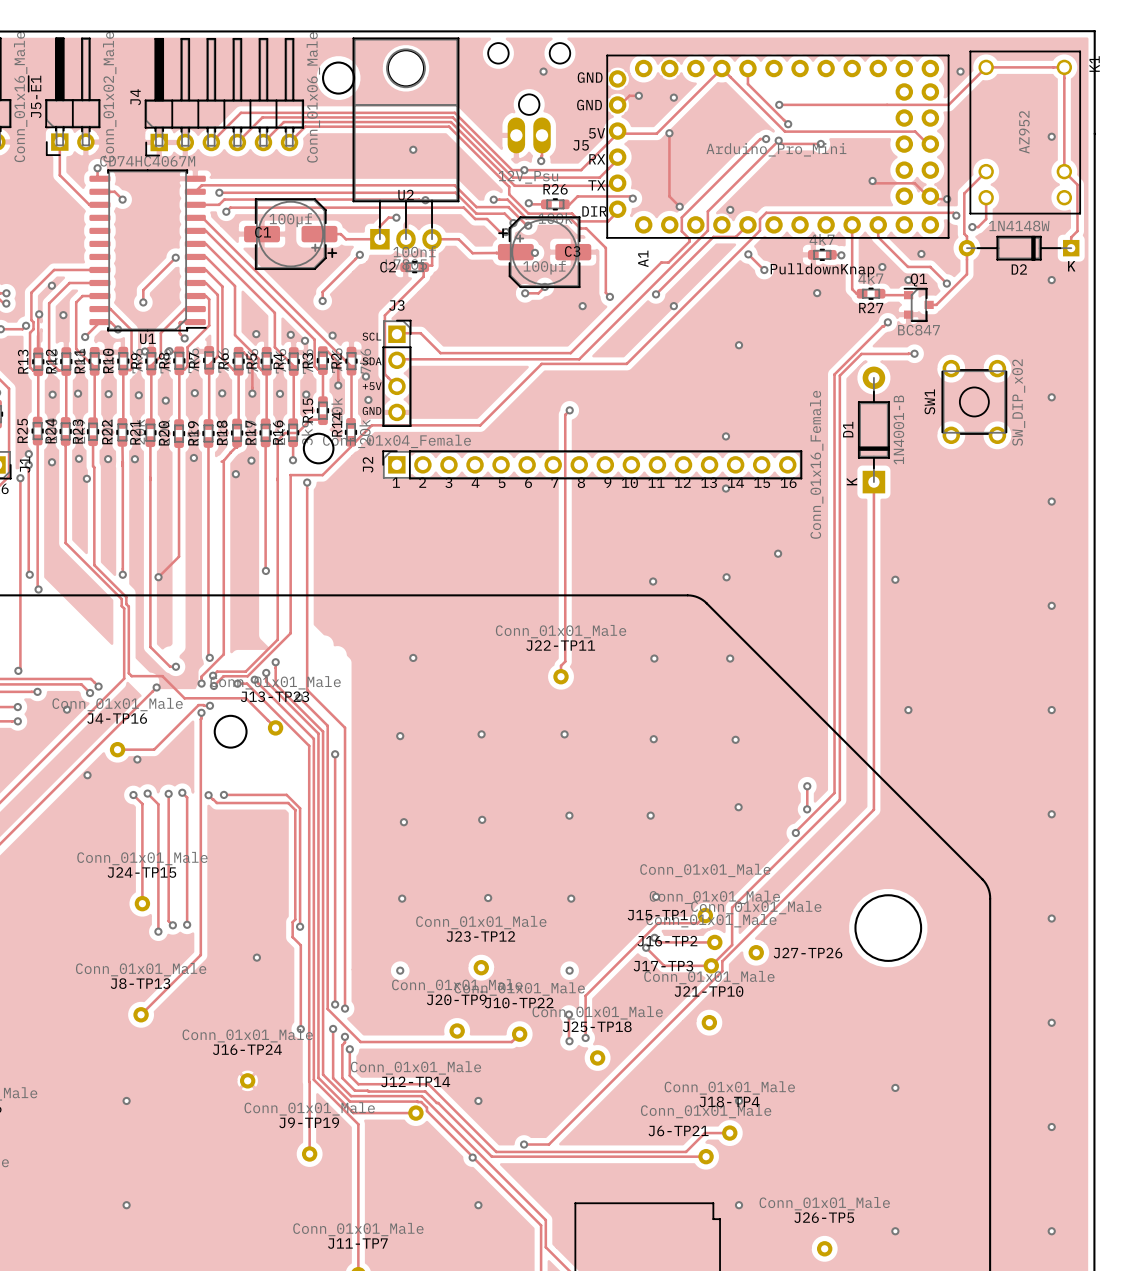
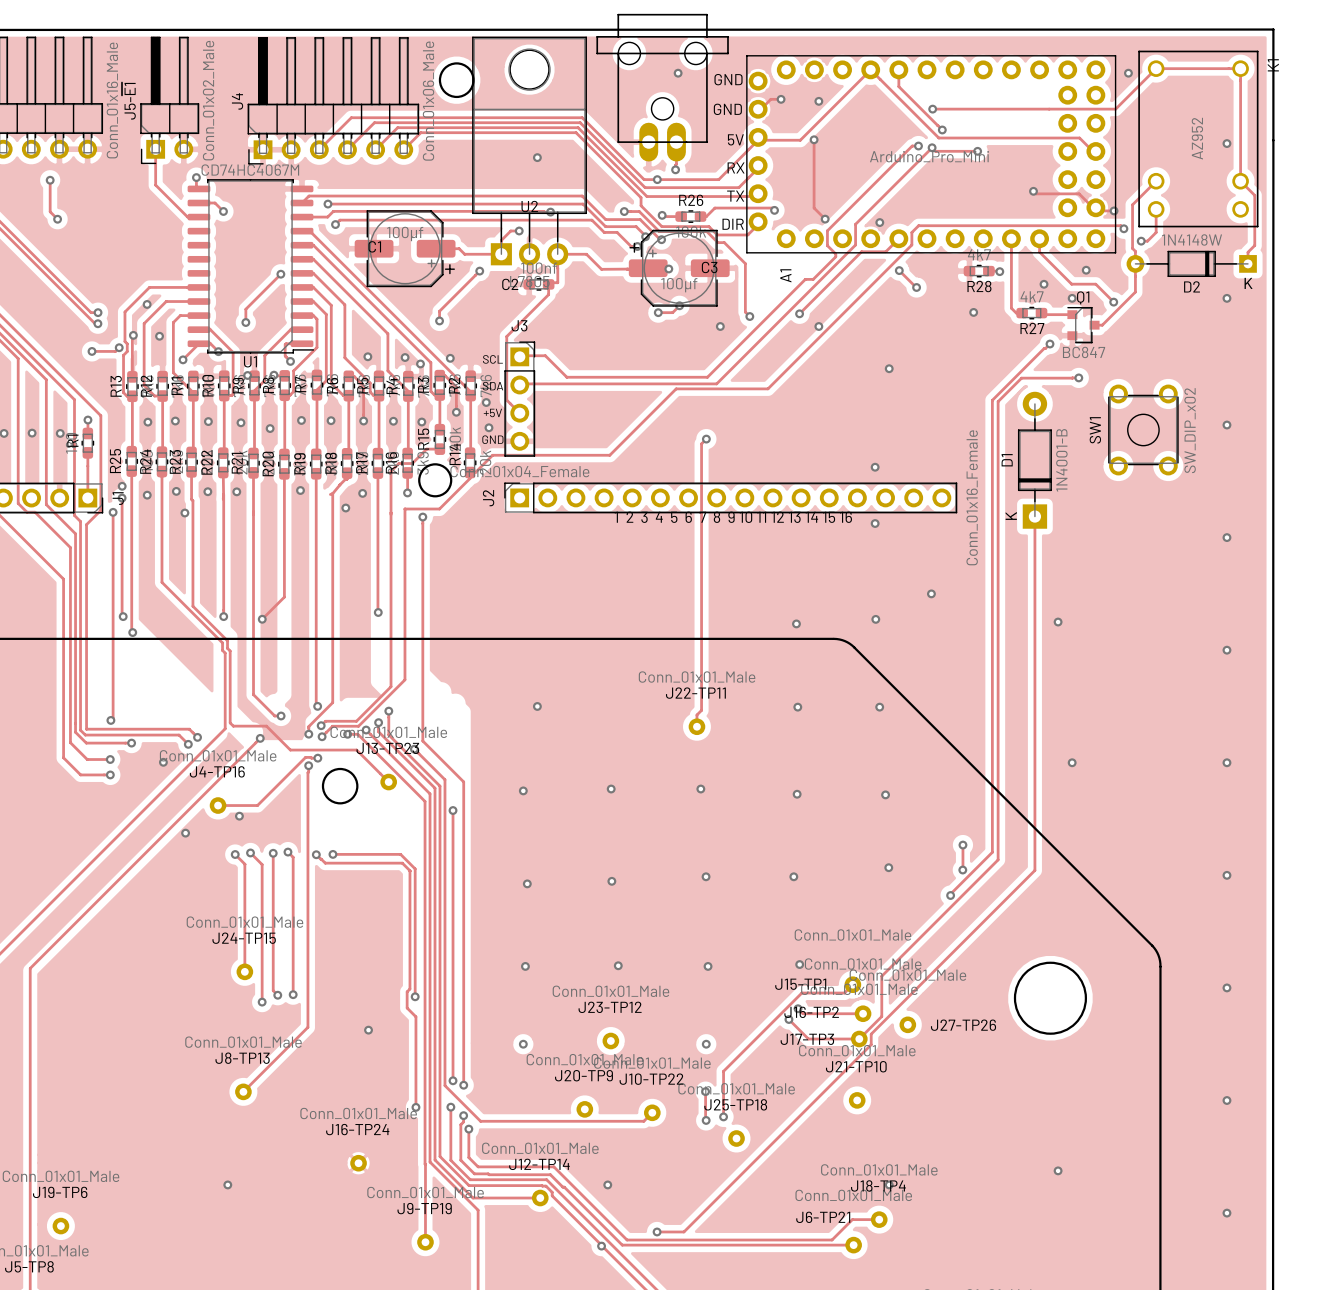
J5 side: bottom (529, 98) -> top (662, 87)
PulldownKnap name: PulldownKnap (822, 270) -> R28 (979, 286)

